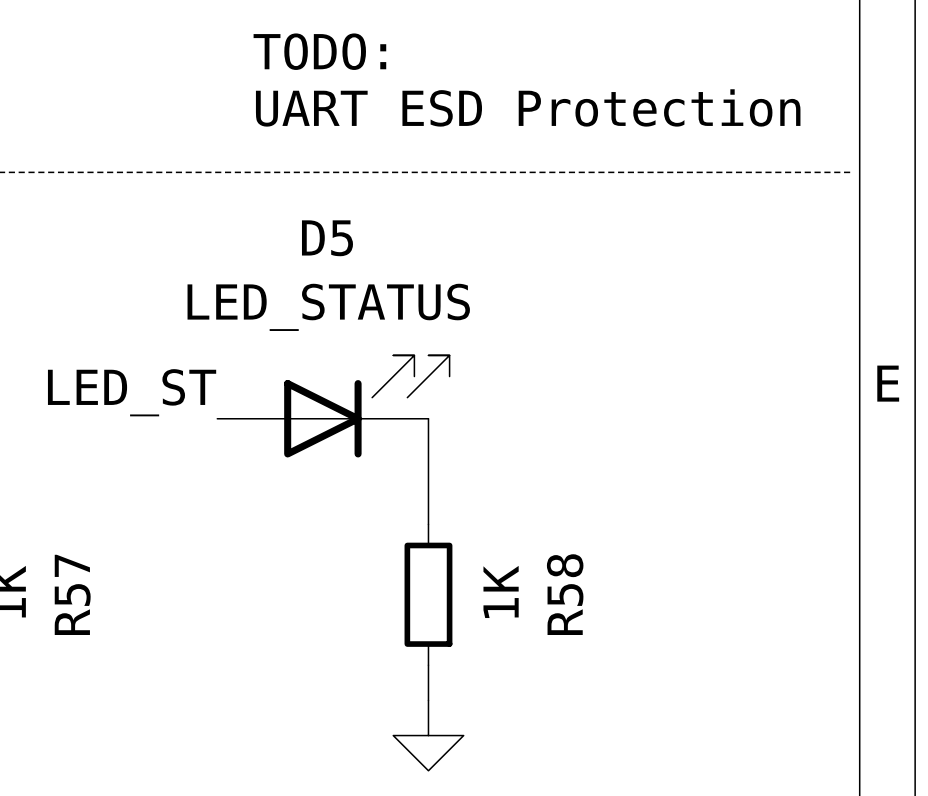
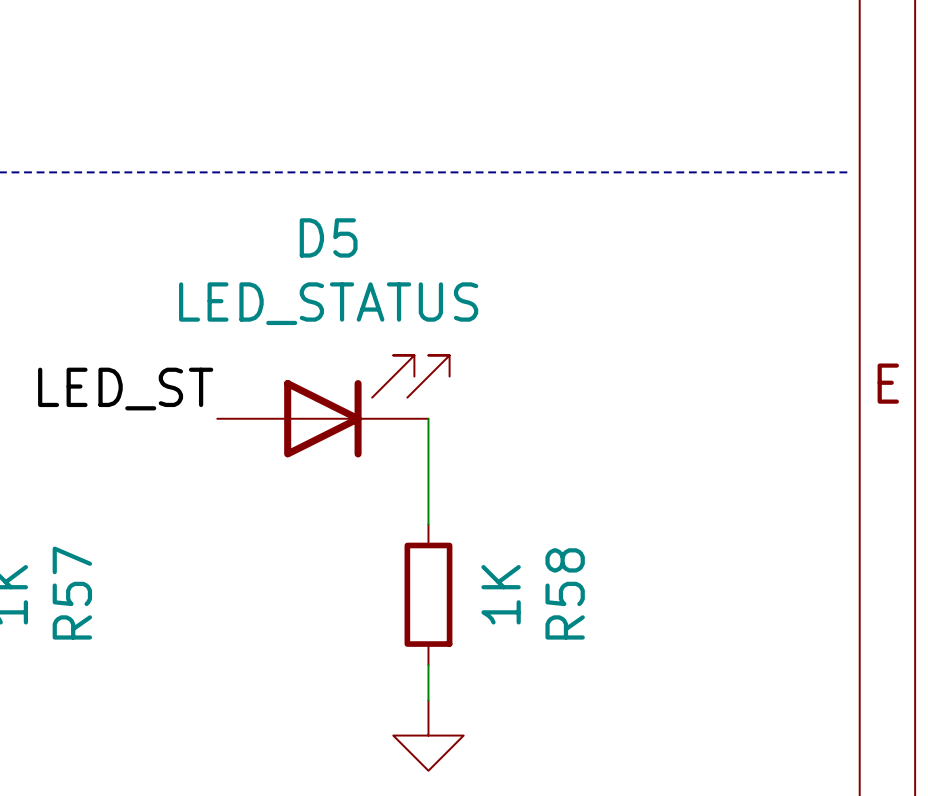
text: TODO: (319, 51) -> none
text: UART ESD Protection (528, 107) -> none

